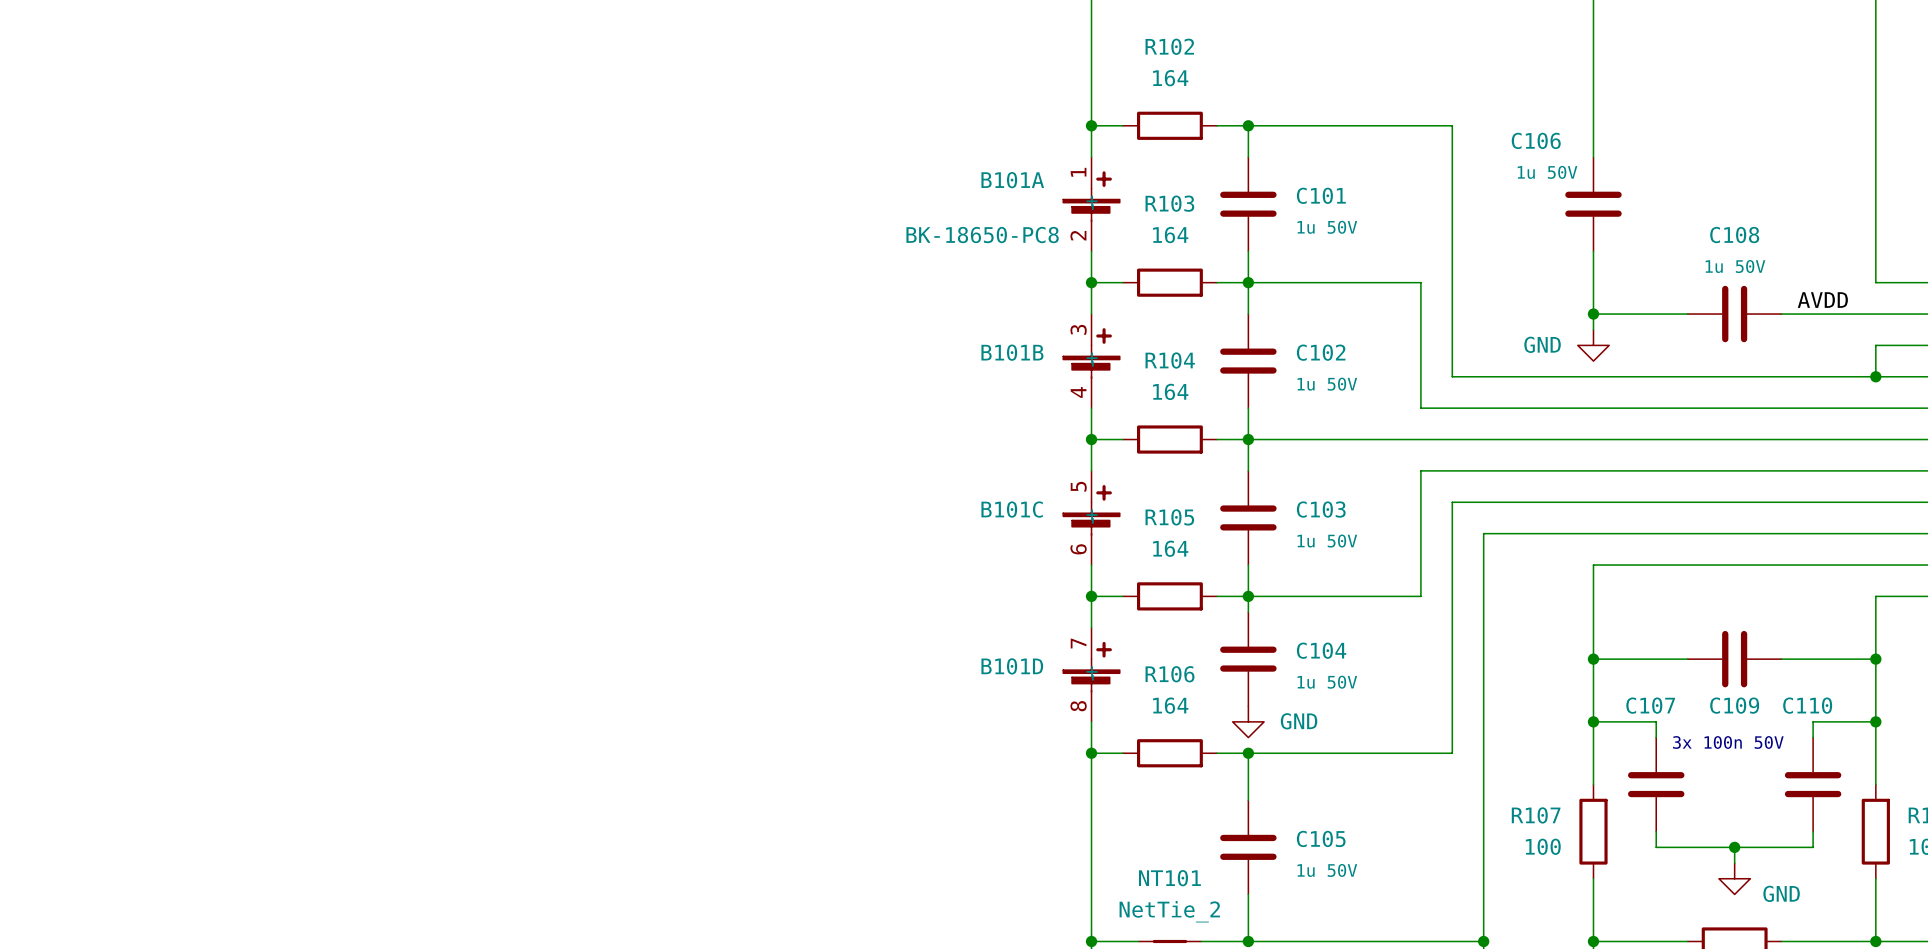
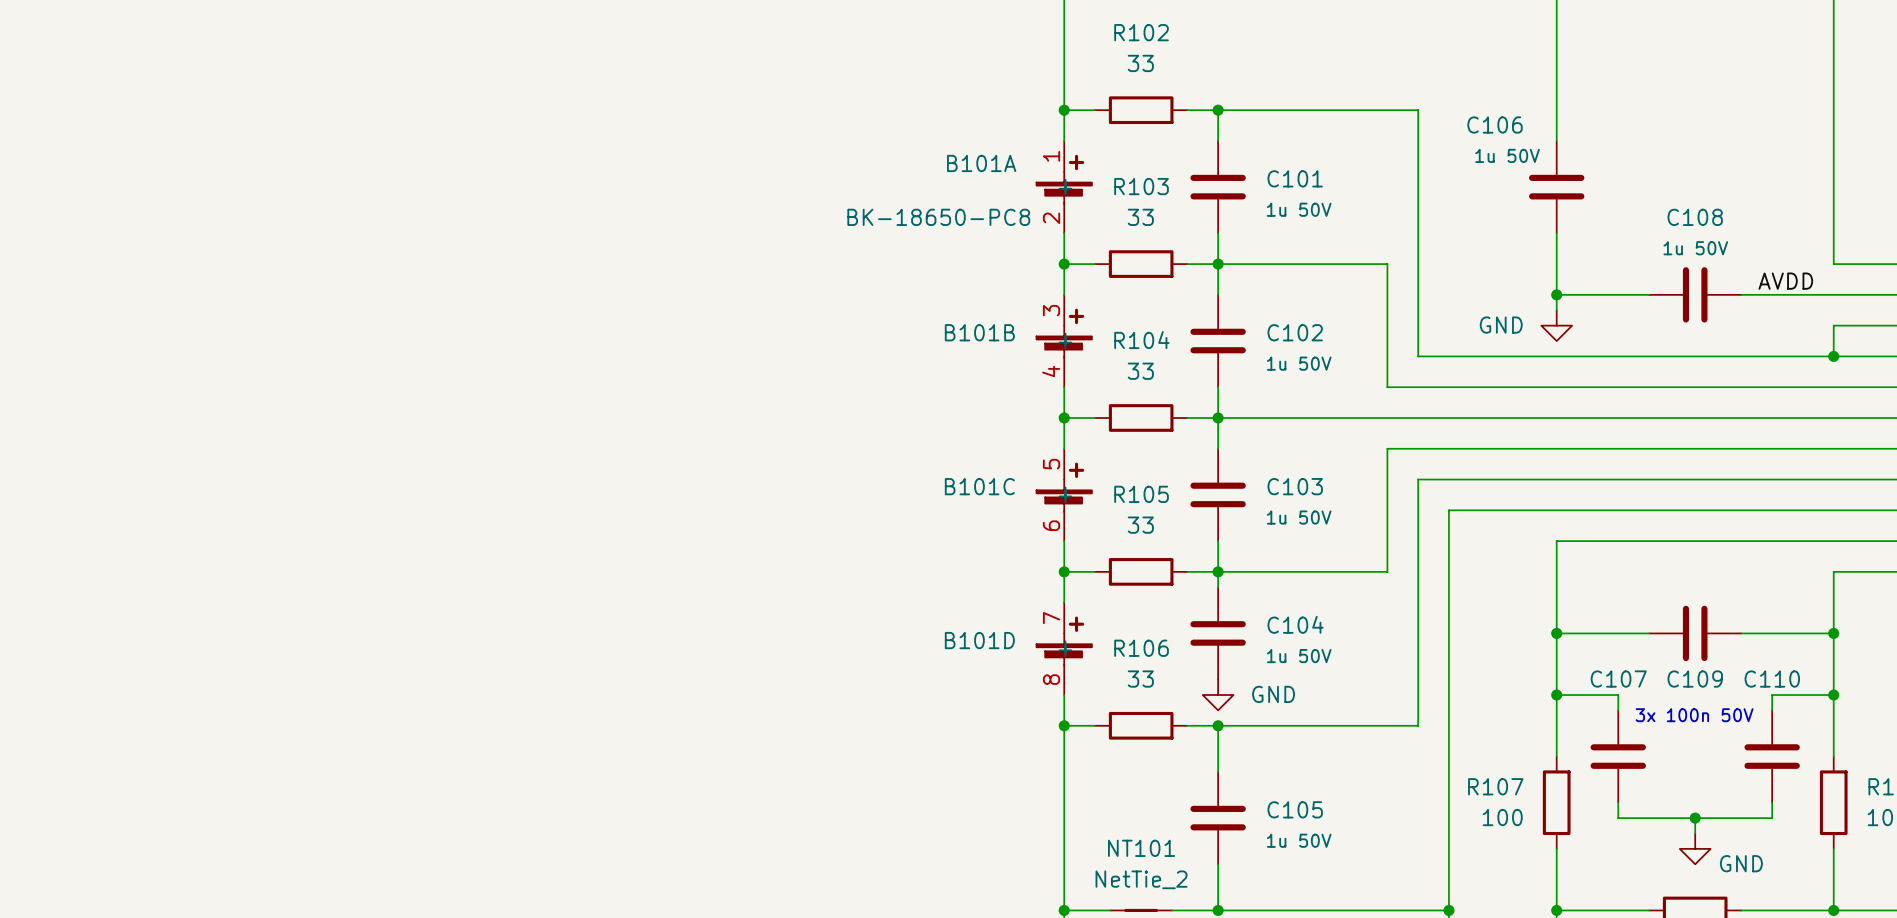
R102 value: 164 (1170, 78) -> 33 (1140, 63)
R103 value: 164 (1170, 235) -> 33 (1140, 217)
R104 value: 164 (1170, 391) -> 33 (1140, 371)
R105 value: 164 (1170, 548) -> 33 (1140, 525)
R106 value: 164 (1170, 705) -> 33 (1140, 679)

